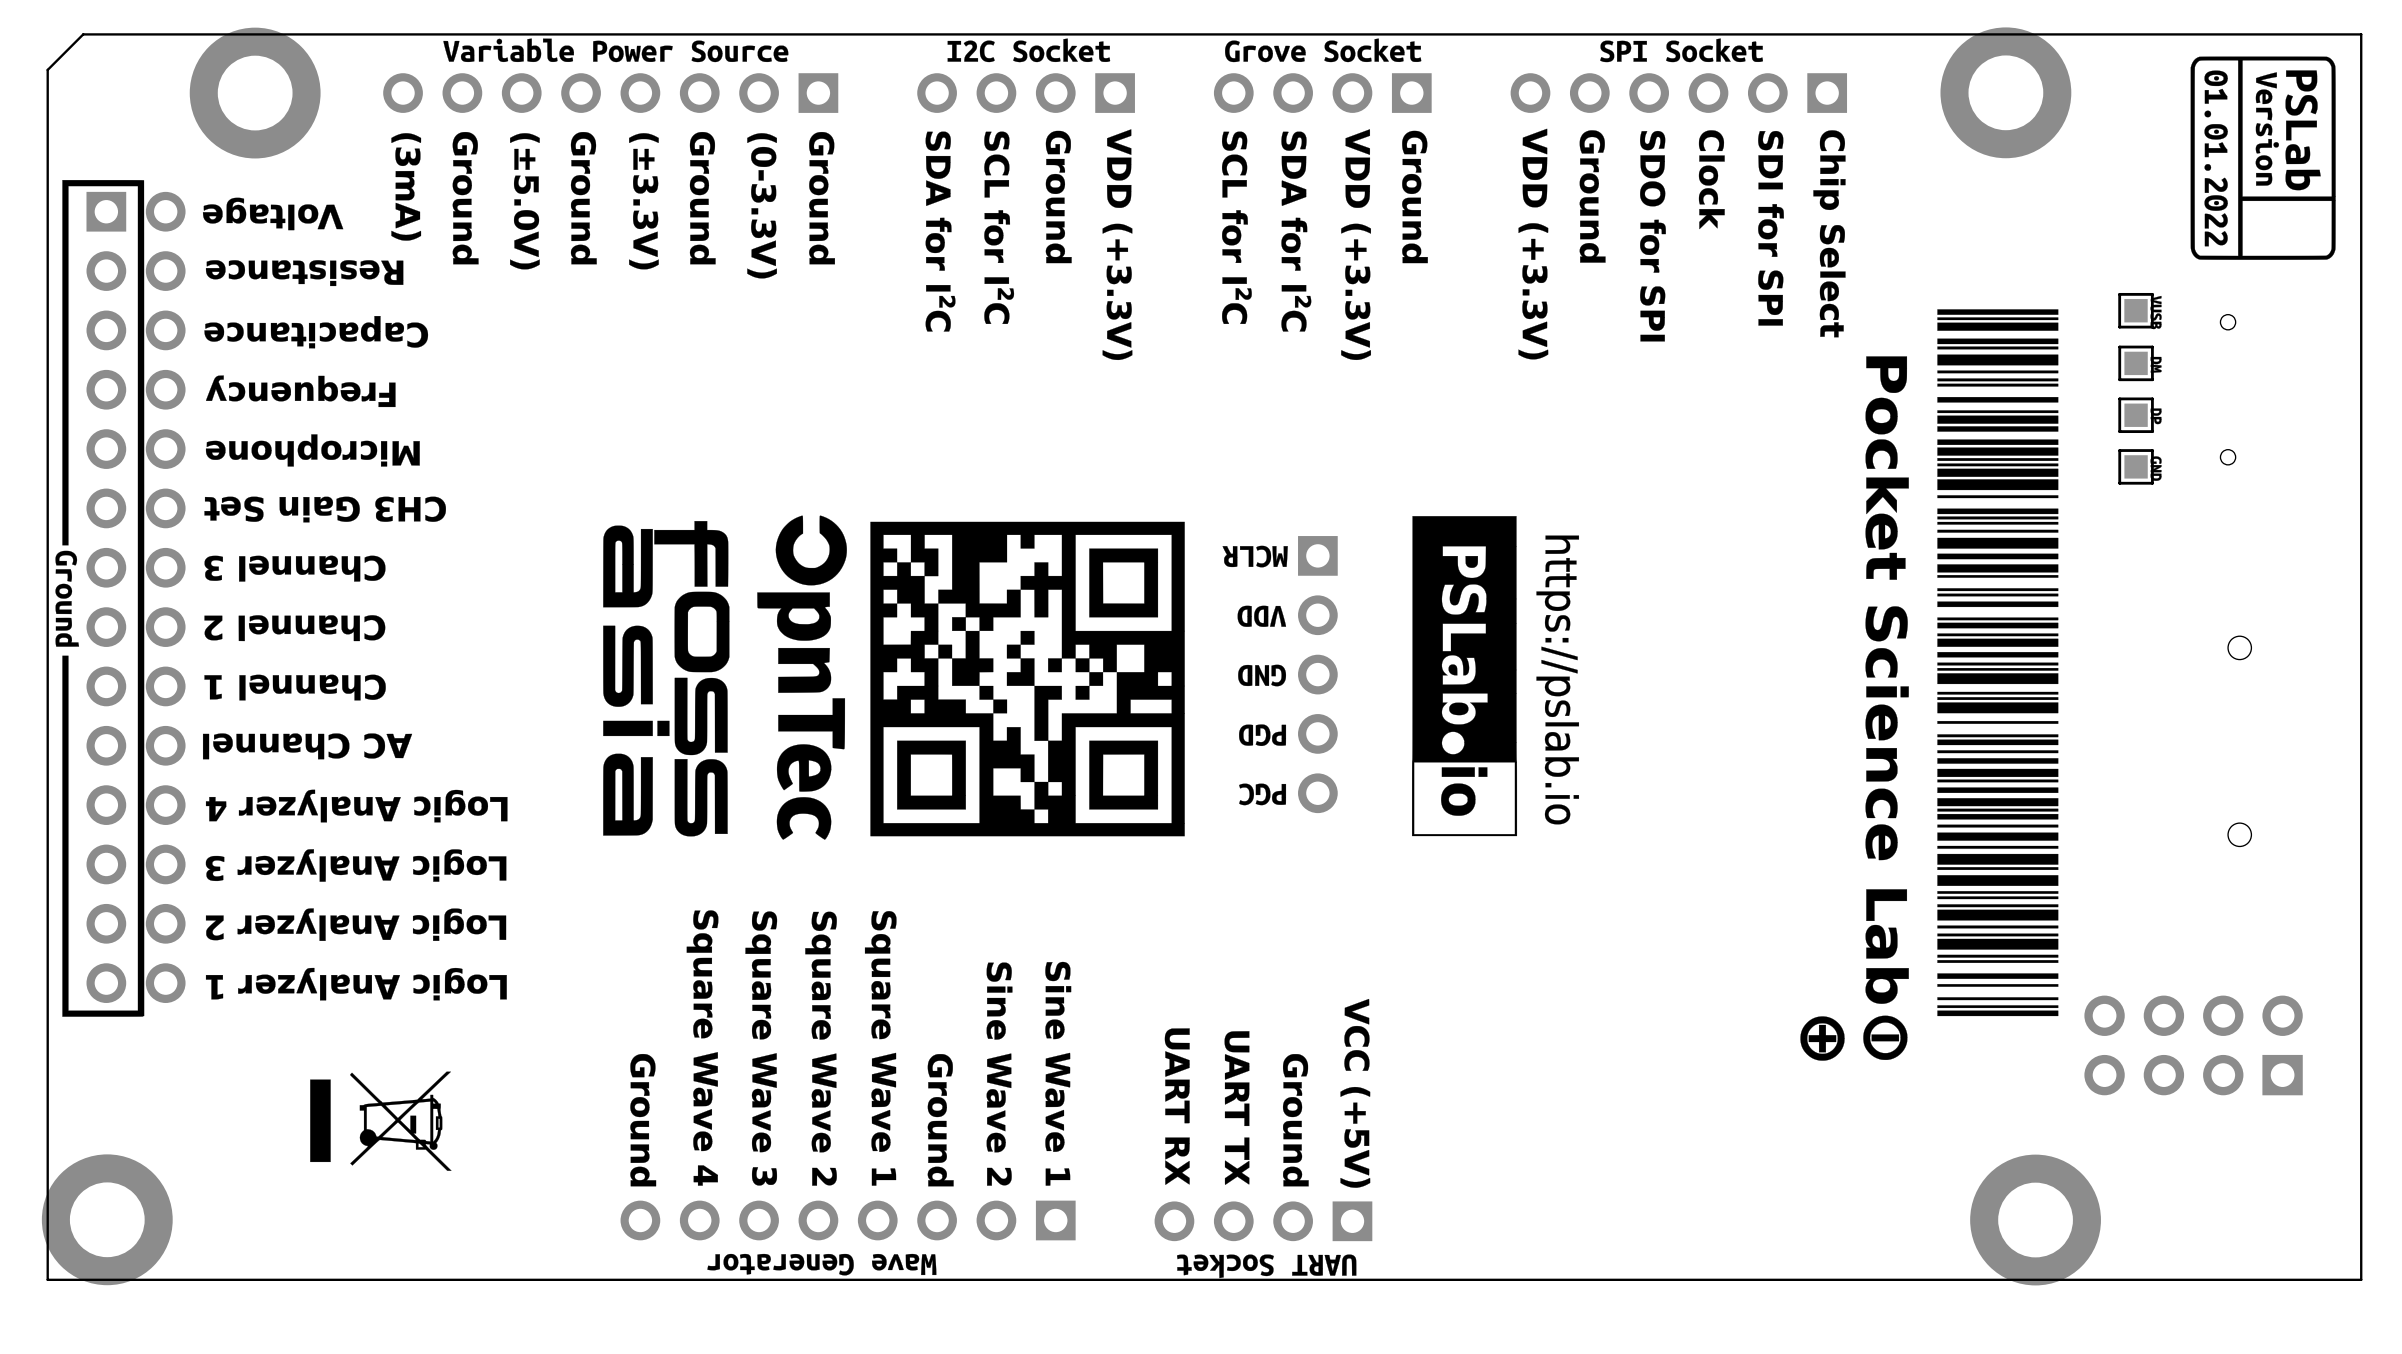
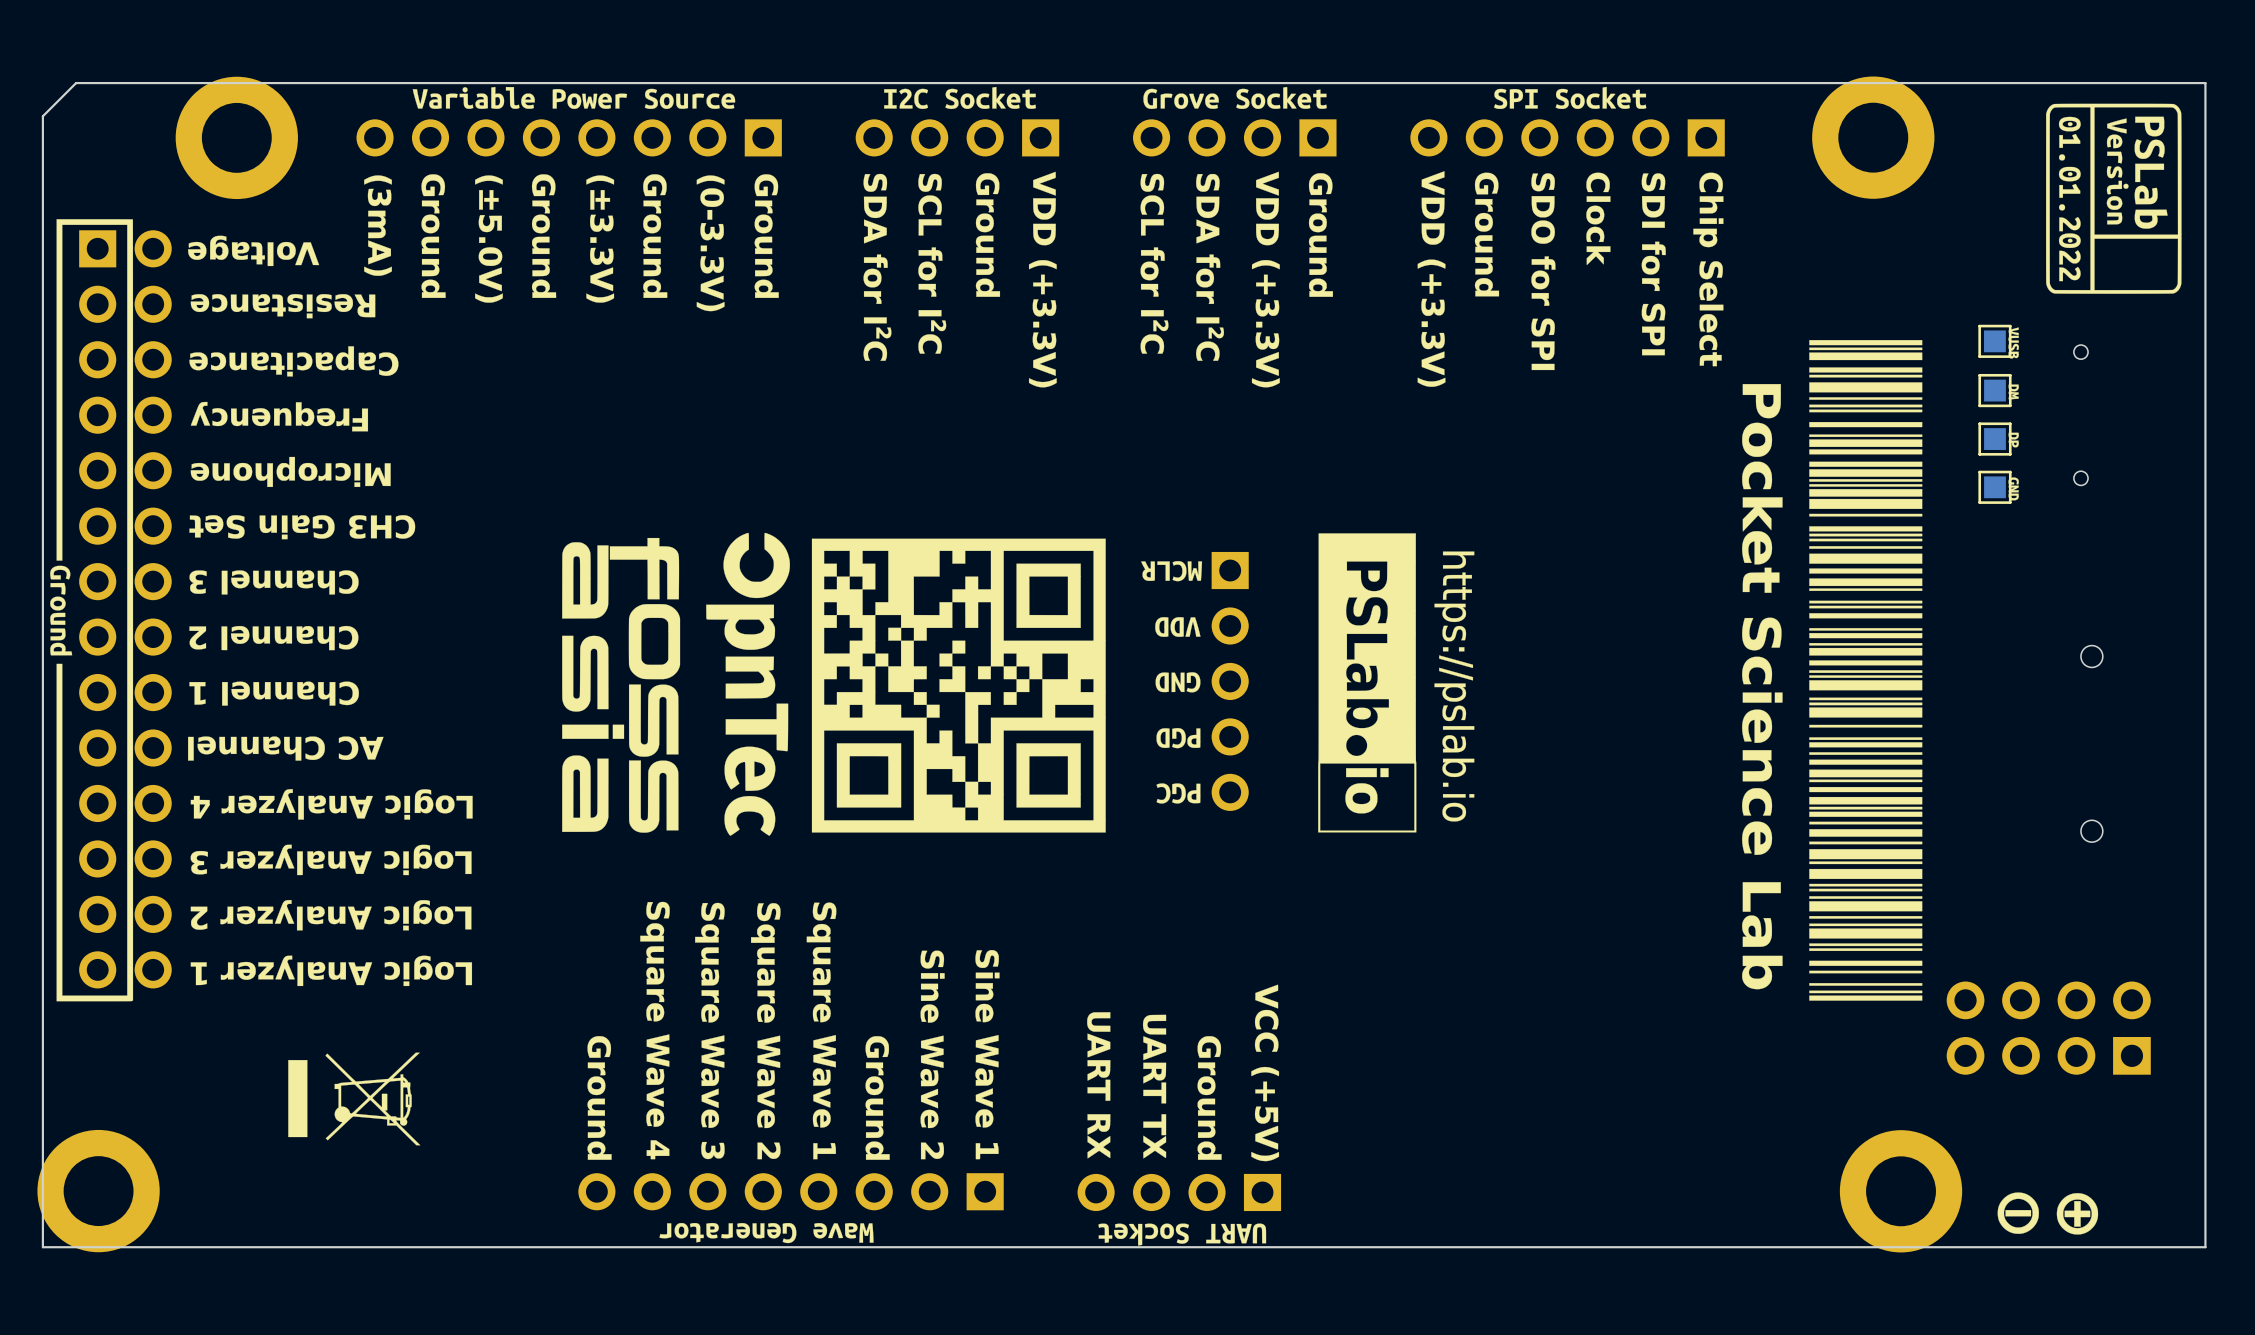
drawing shape: [55, 38, 2336, 1279] -> [50, 86, 2182, 1246]

